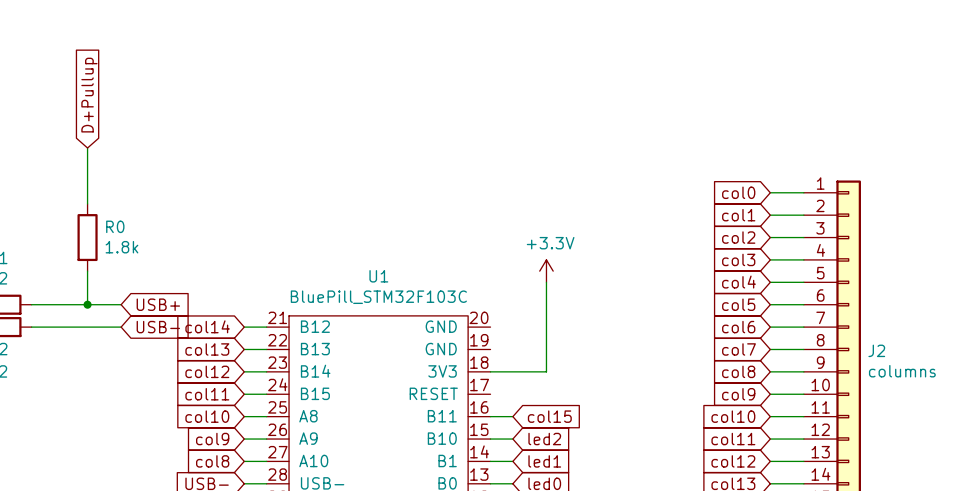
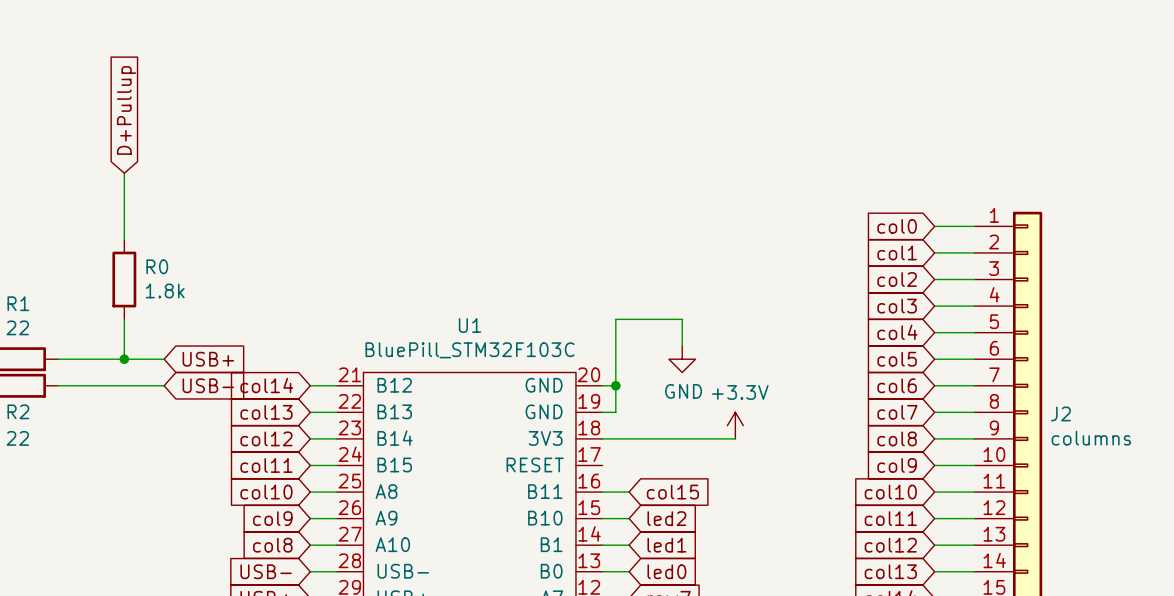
power symbol position: +3.3V (546, 271) -> +3.3V (735, 425)
wire: (546, 282) (546, 371) -> (735, 438) (668, 438)
wire: none -> (682, 345) (682, 319) (615, 319) (615, 412) (602, 412)
power symbol: none -> GND (682, 359)
wire: none -> (602, 385) (615, 385)
junction: none -> (615, 385)

